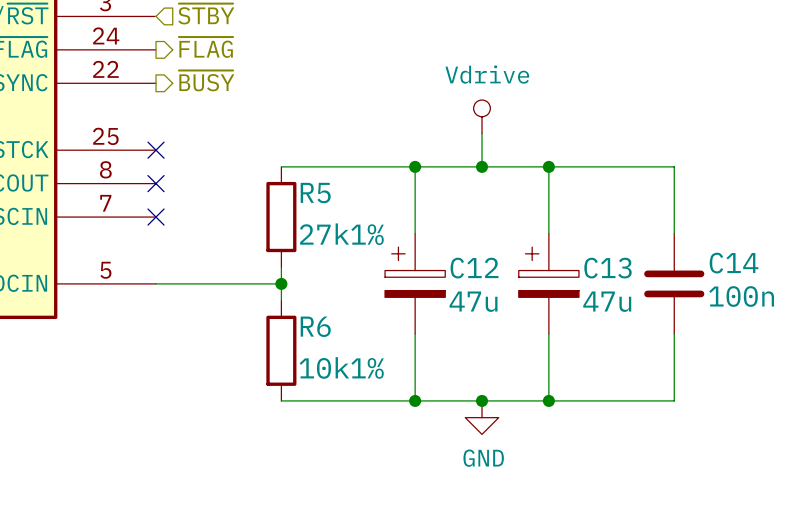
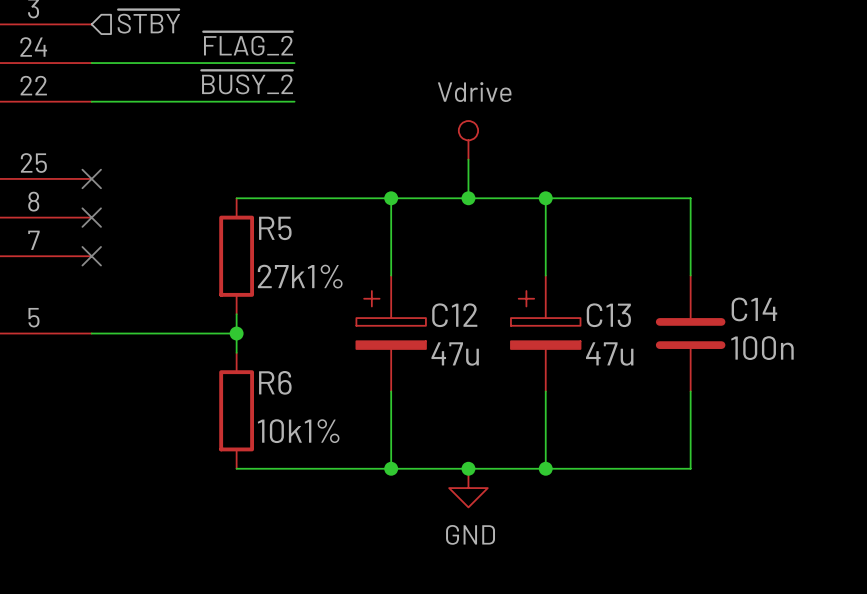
label: none -> ~{FLAG_2} (248, 43)
hierarchical label: ~{FLAG} (205, 47) -> none
wire: none -> (91, 63) (294, 63)
label: none -> ~{BUSY_2} (247, 82)
hierarchical label: ~{BUSY} (206, 80) -> none
wire: none -> (91, 101) (294, 101)

